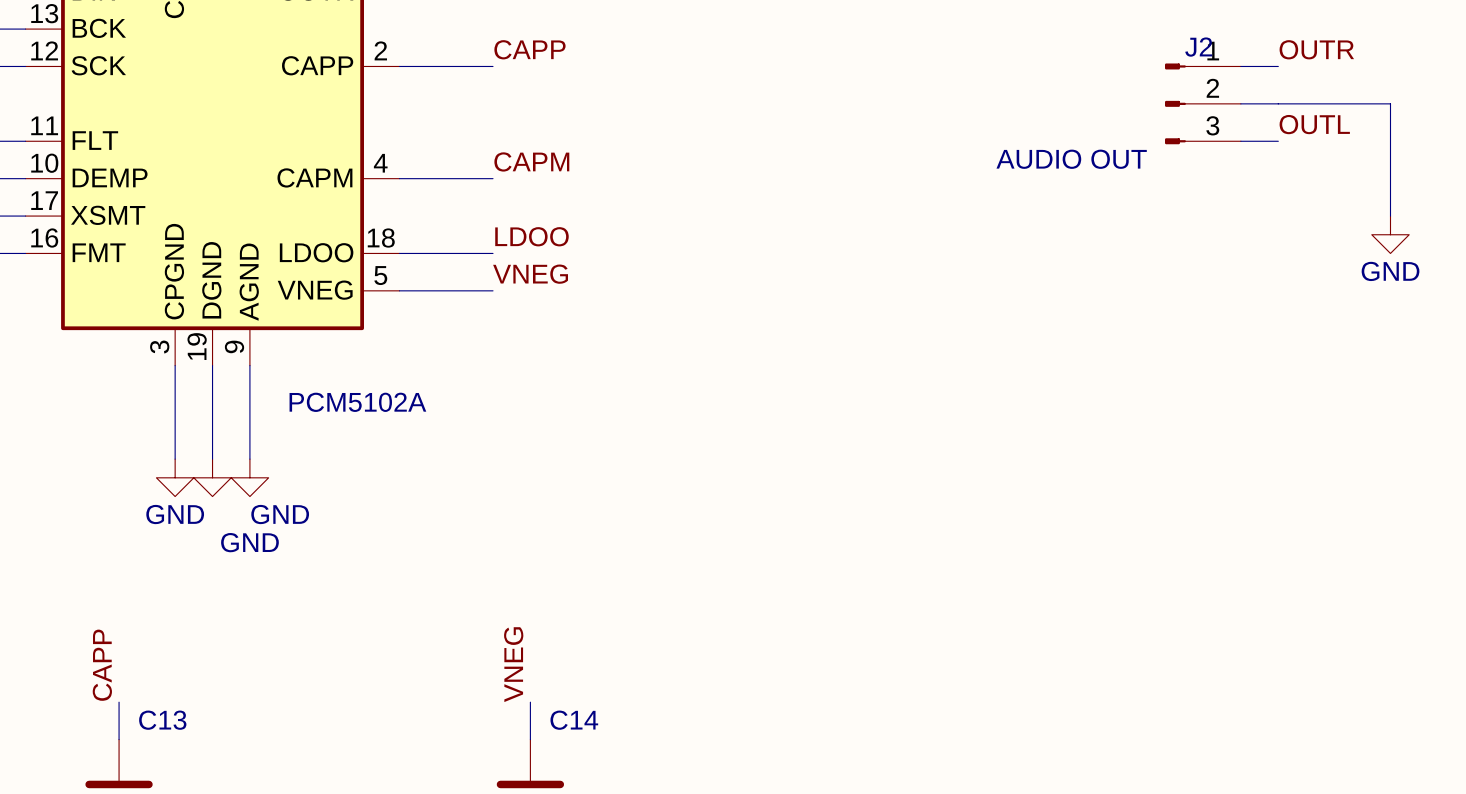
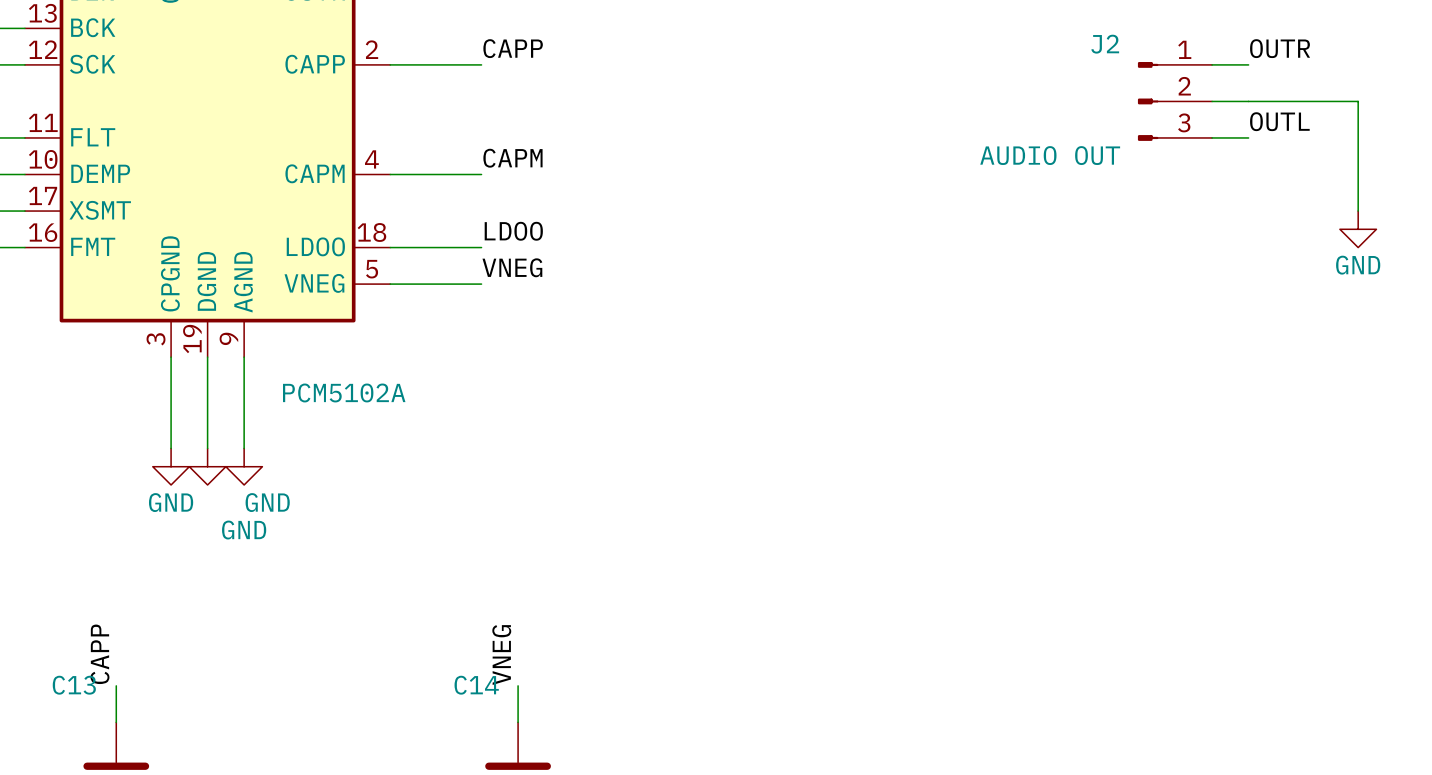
J2 name position: J2 (1198, 47) -> J2 (1105, 44)
C13 name position: C13 (162, 720) -> C13 (74, 685)
C14 name position: C14 (574, 720) -> C14 (476, 685)

